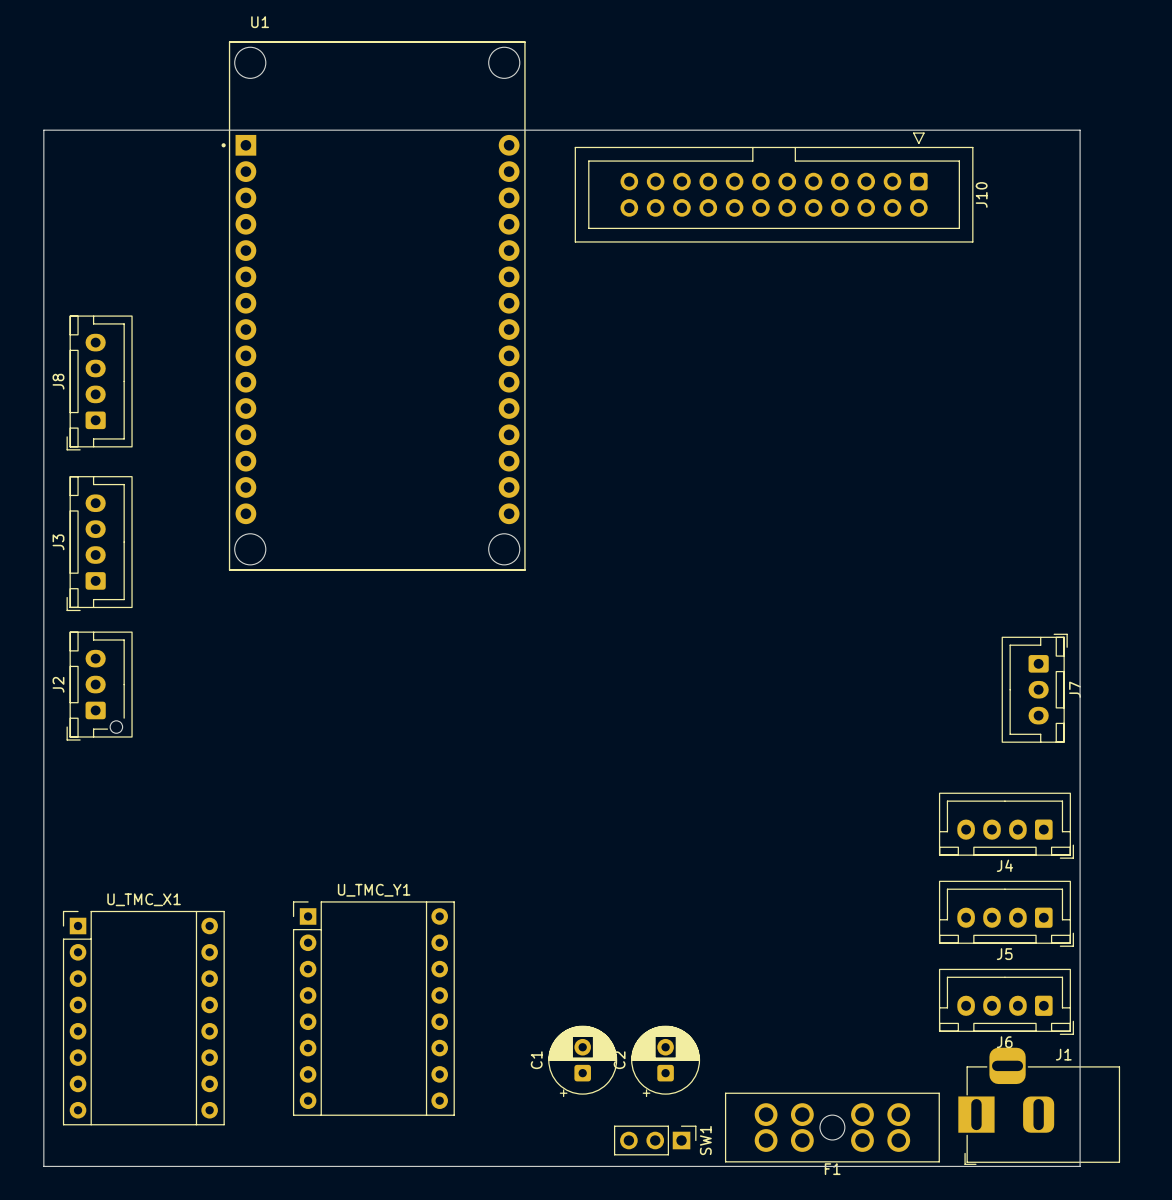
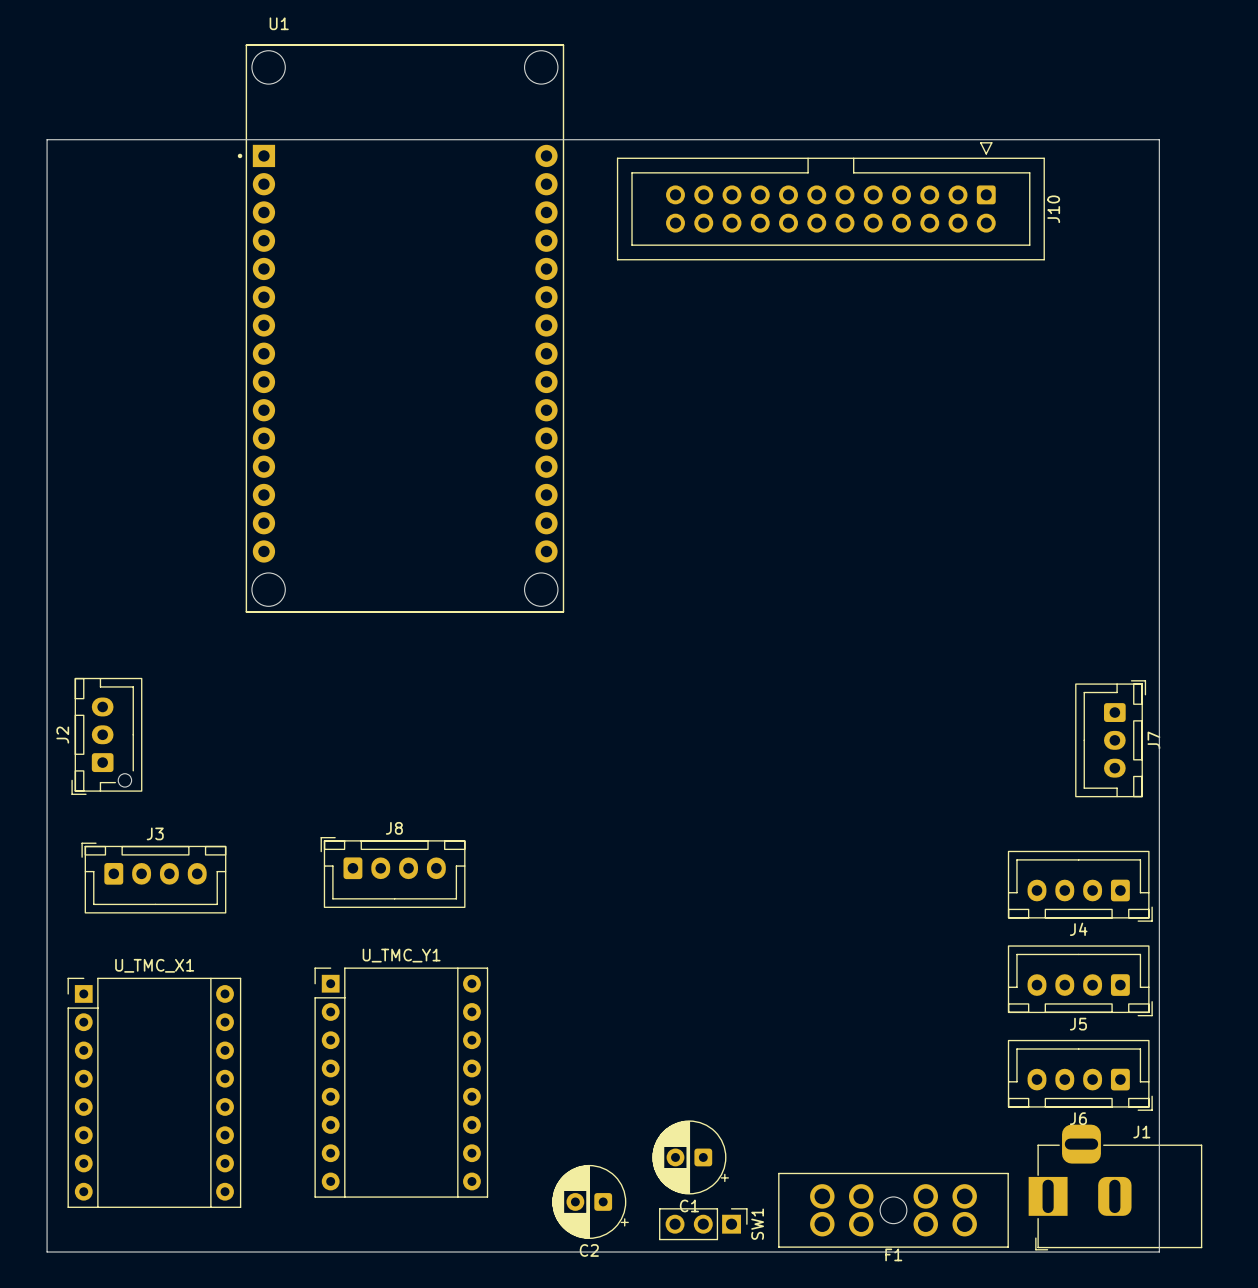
J8 rotation: 0° (99, 382) -> 90° clockwise (393, 872)
J8 position: (99, 382) -> (393, 872)
J3 rotation: 0° (99, 543) -> 90° clockwise (153, 878)
J3 position: (99, 543) -> (153, 878)
C1 rotation: 0° (582, 1061) -> 90° counterclockwise (690, 1157)
C1 position: (582, 1061) -> (690, 1157)
C2 rotation: 0° (665, 1061) -> 90° counterclockwise (590, 1201)
C2 position: (665, 1061) -> (590, 1201)

